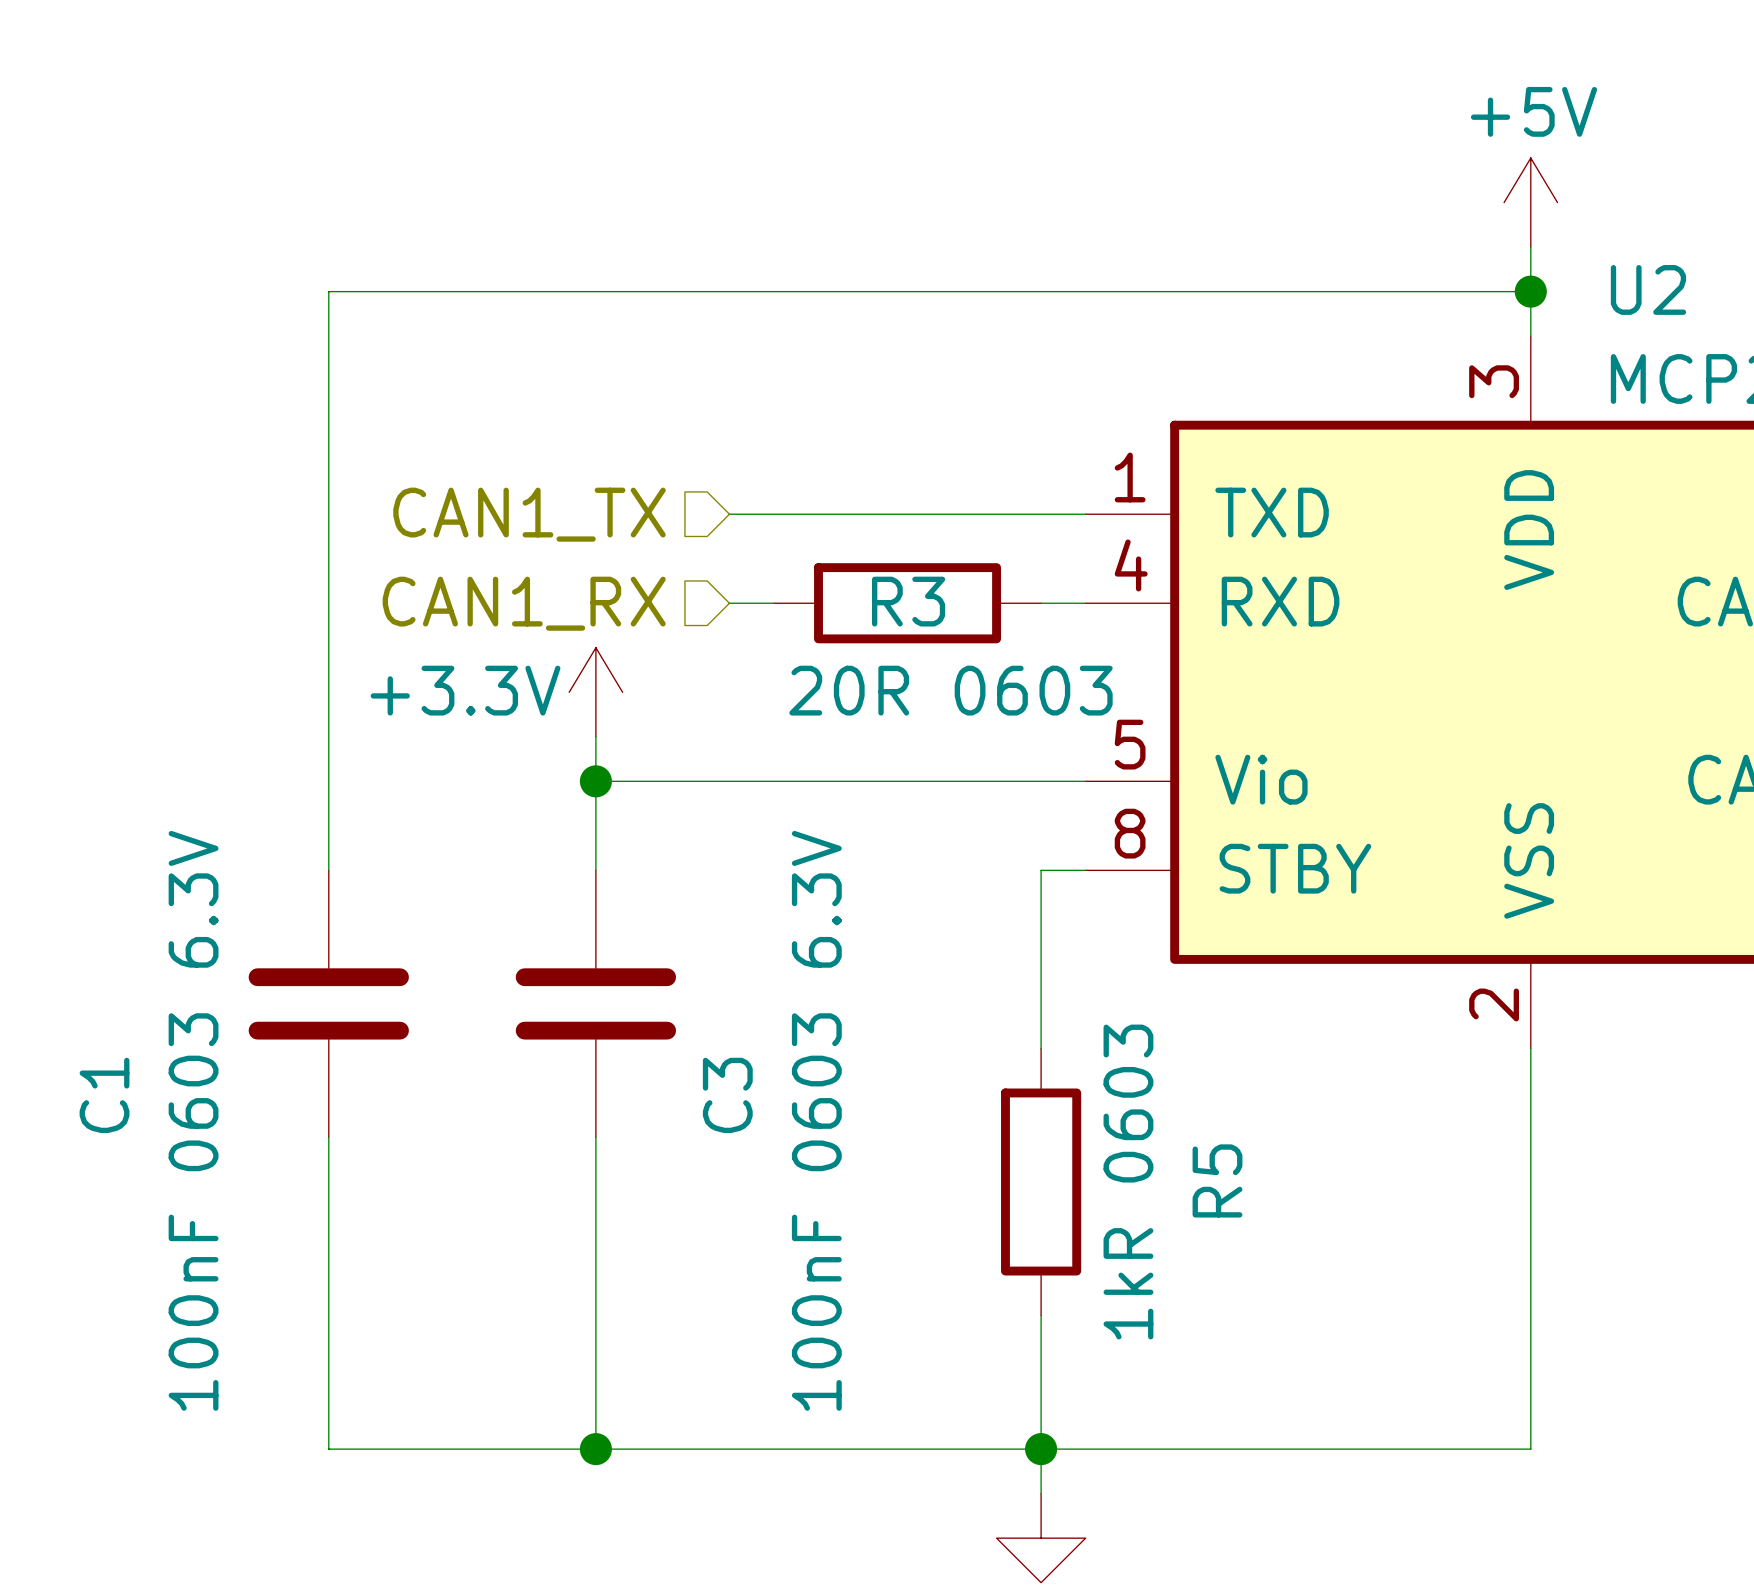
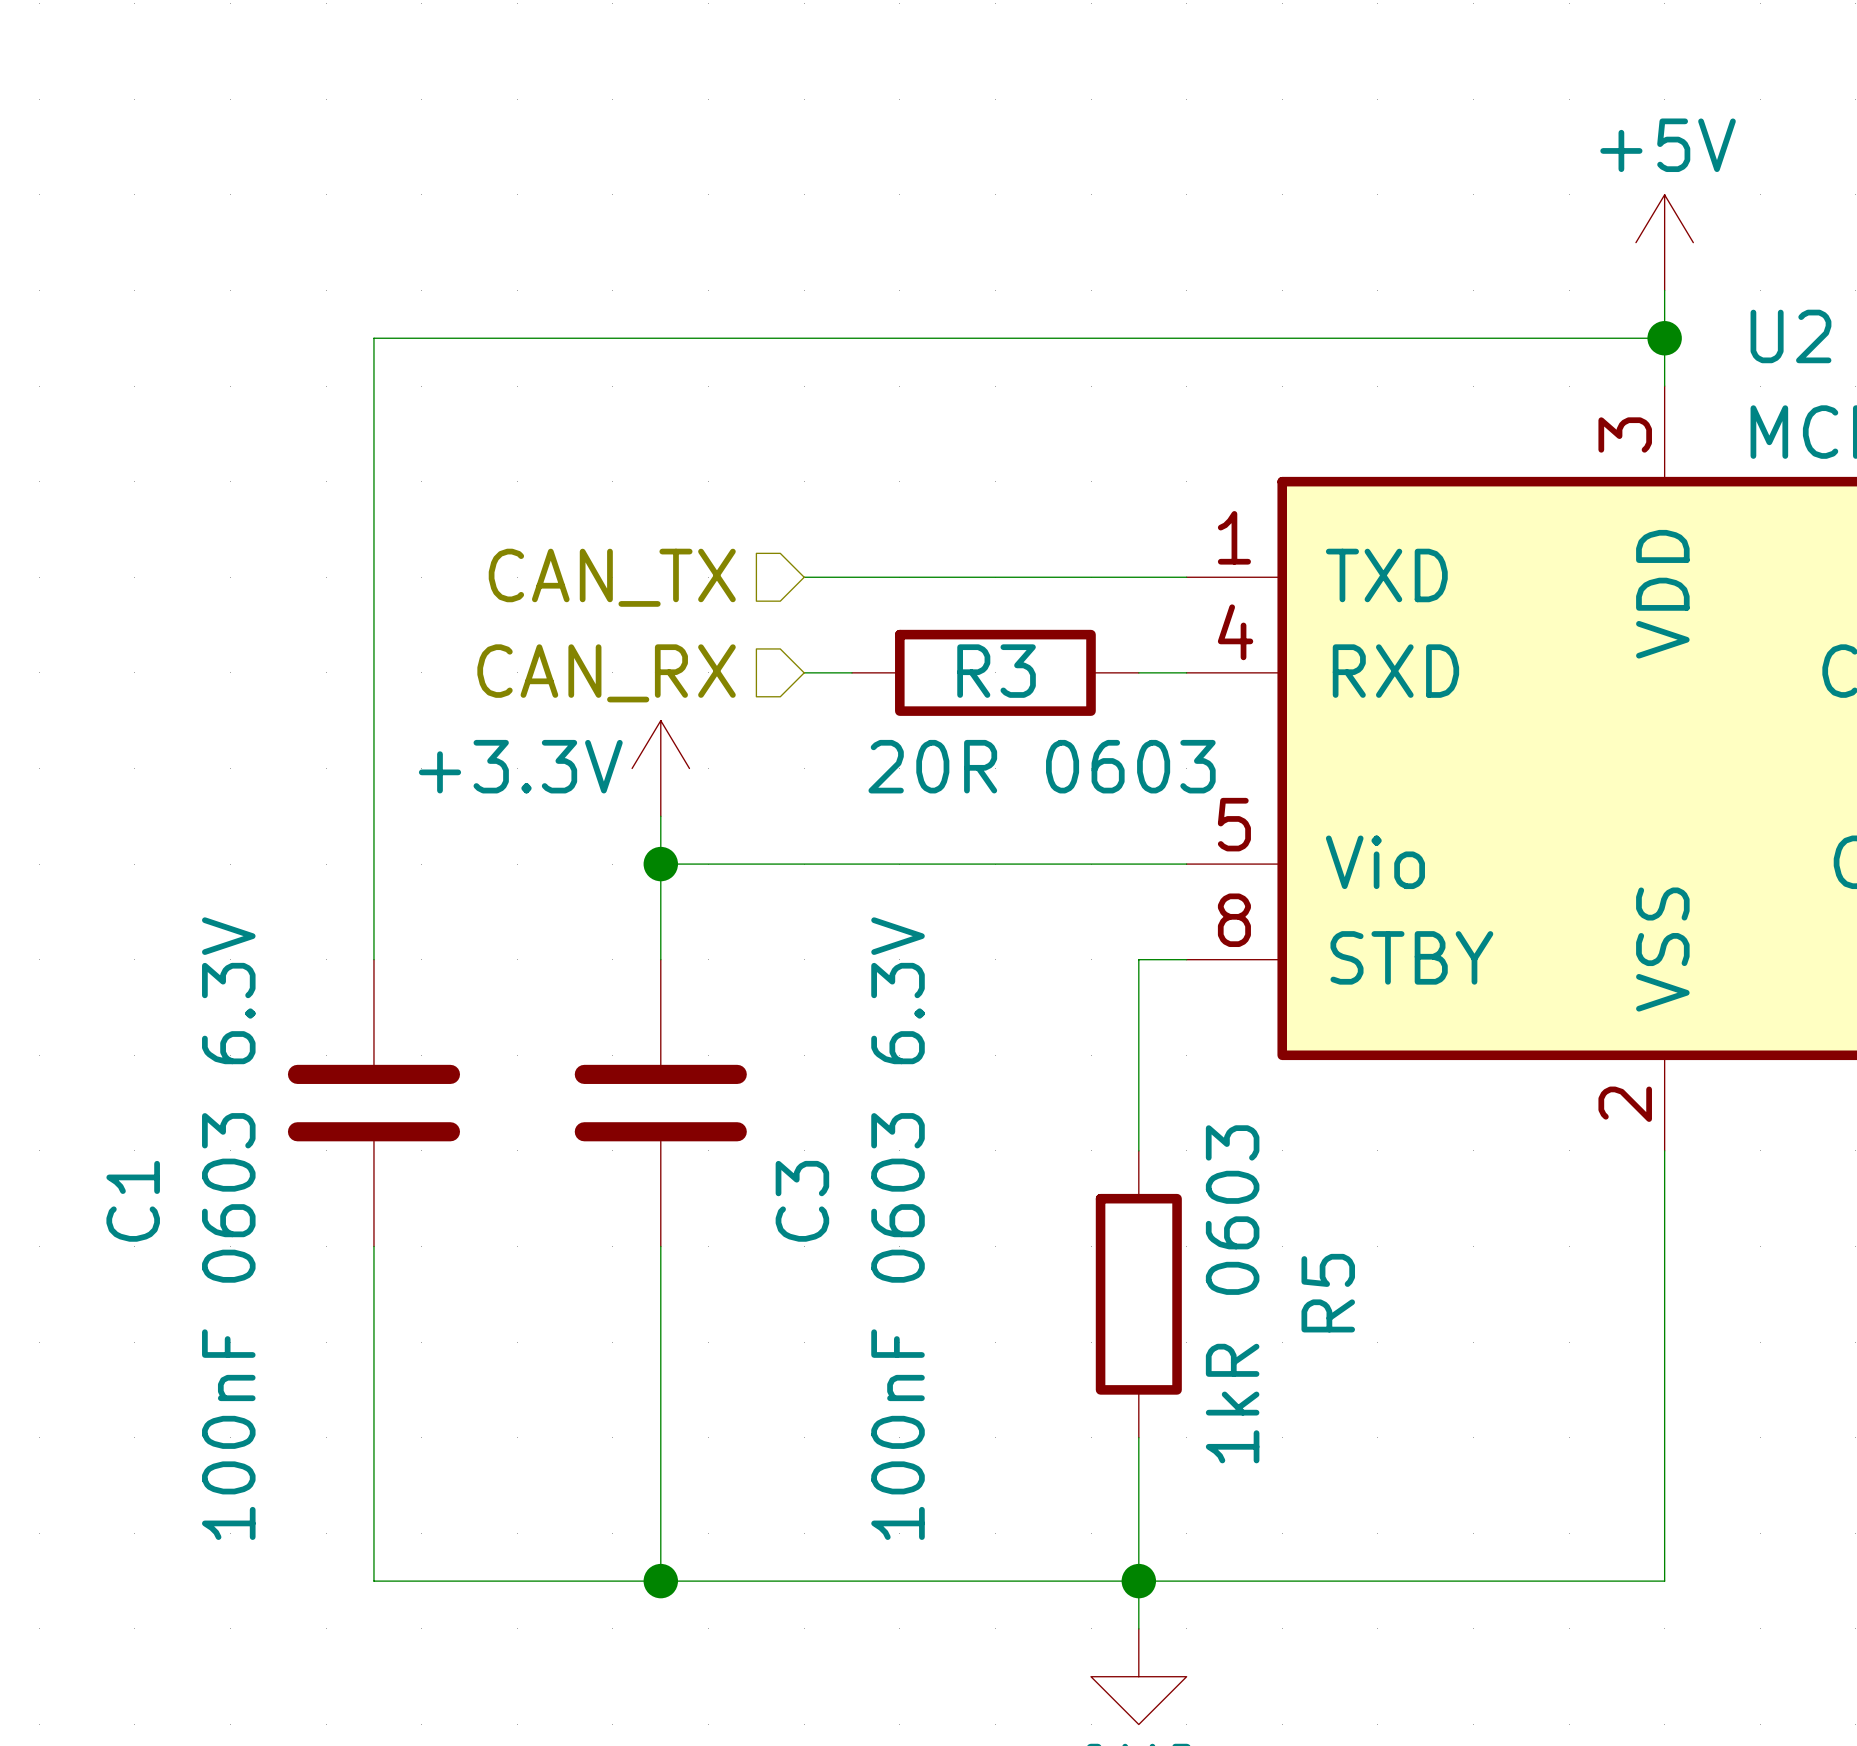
hierarchical label: CAN1_TX (529, 514) -> CAN_TX (612, 577)
hierarchical label: CAN1_RX (524, 603) -> CAN_RX (606, 673)

